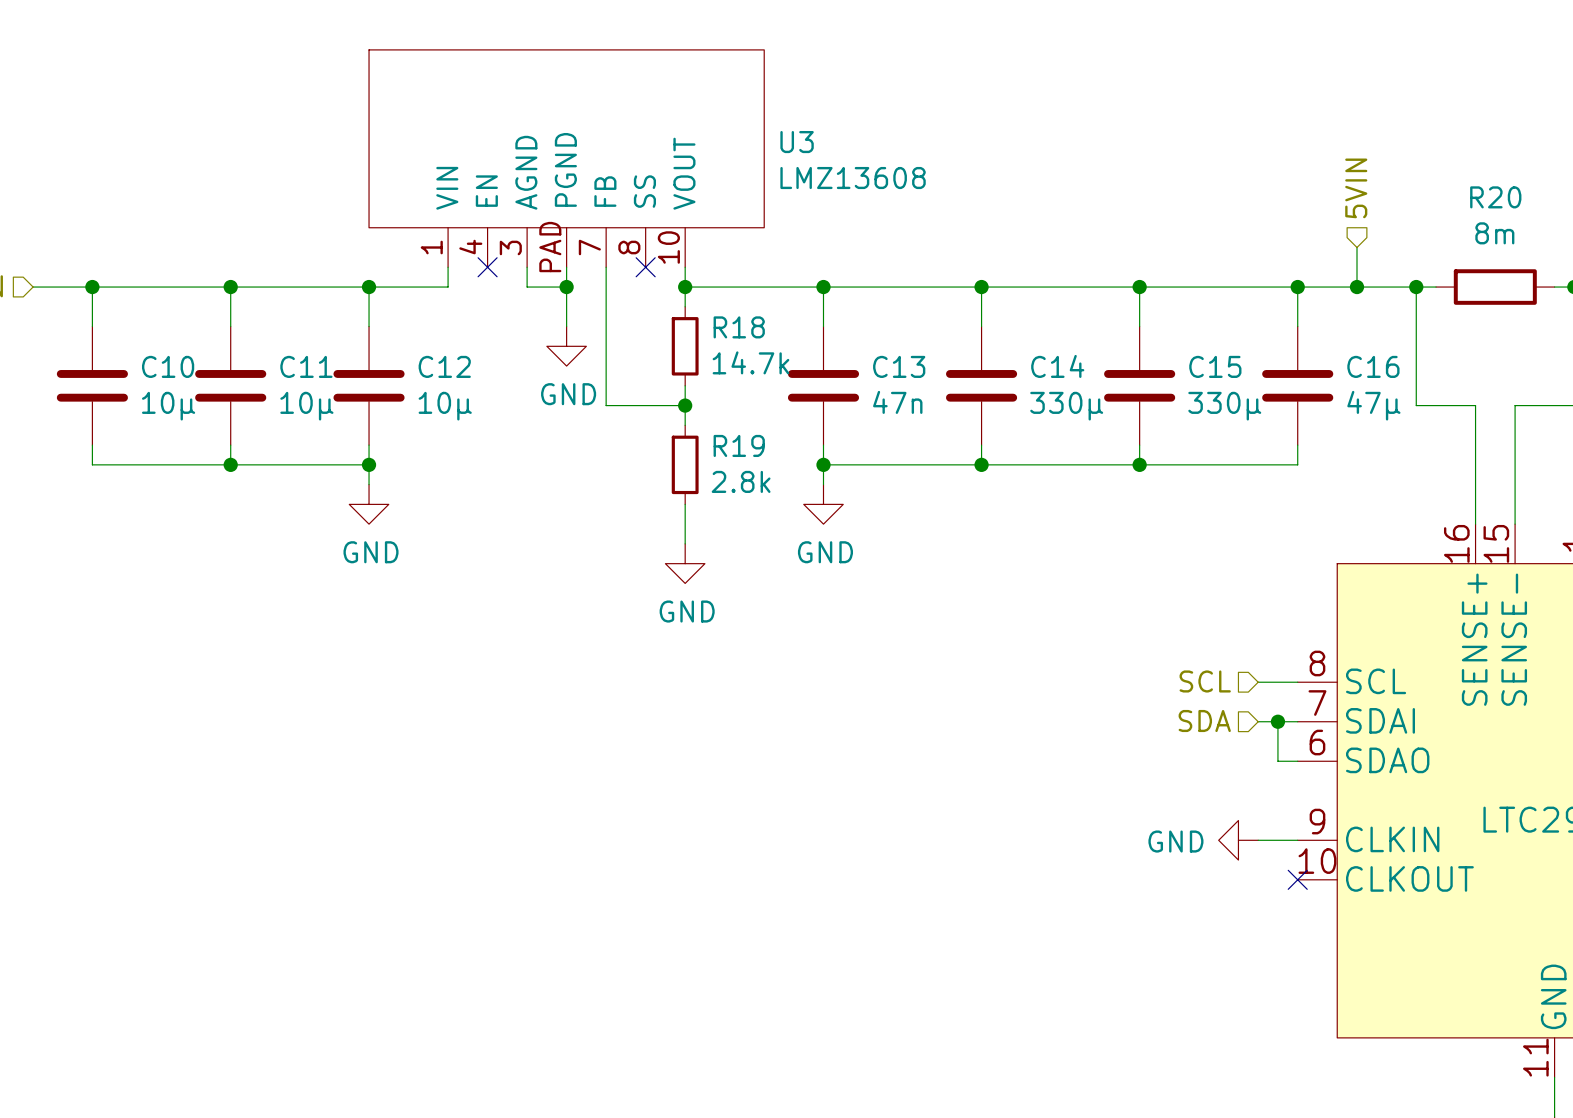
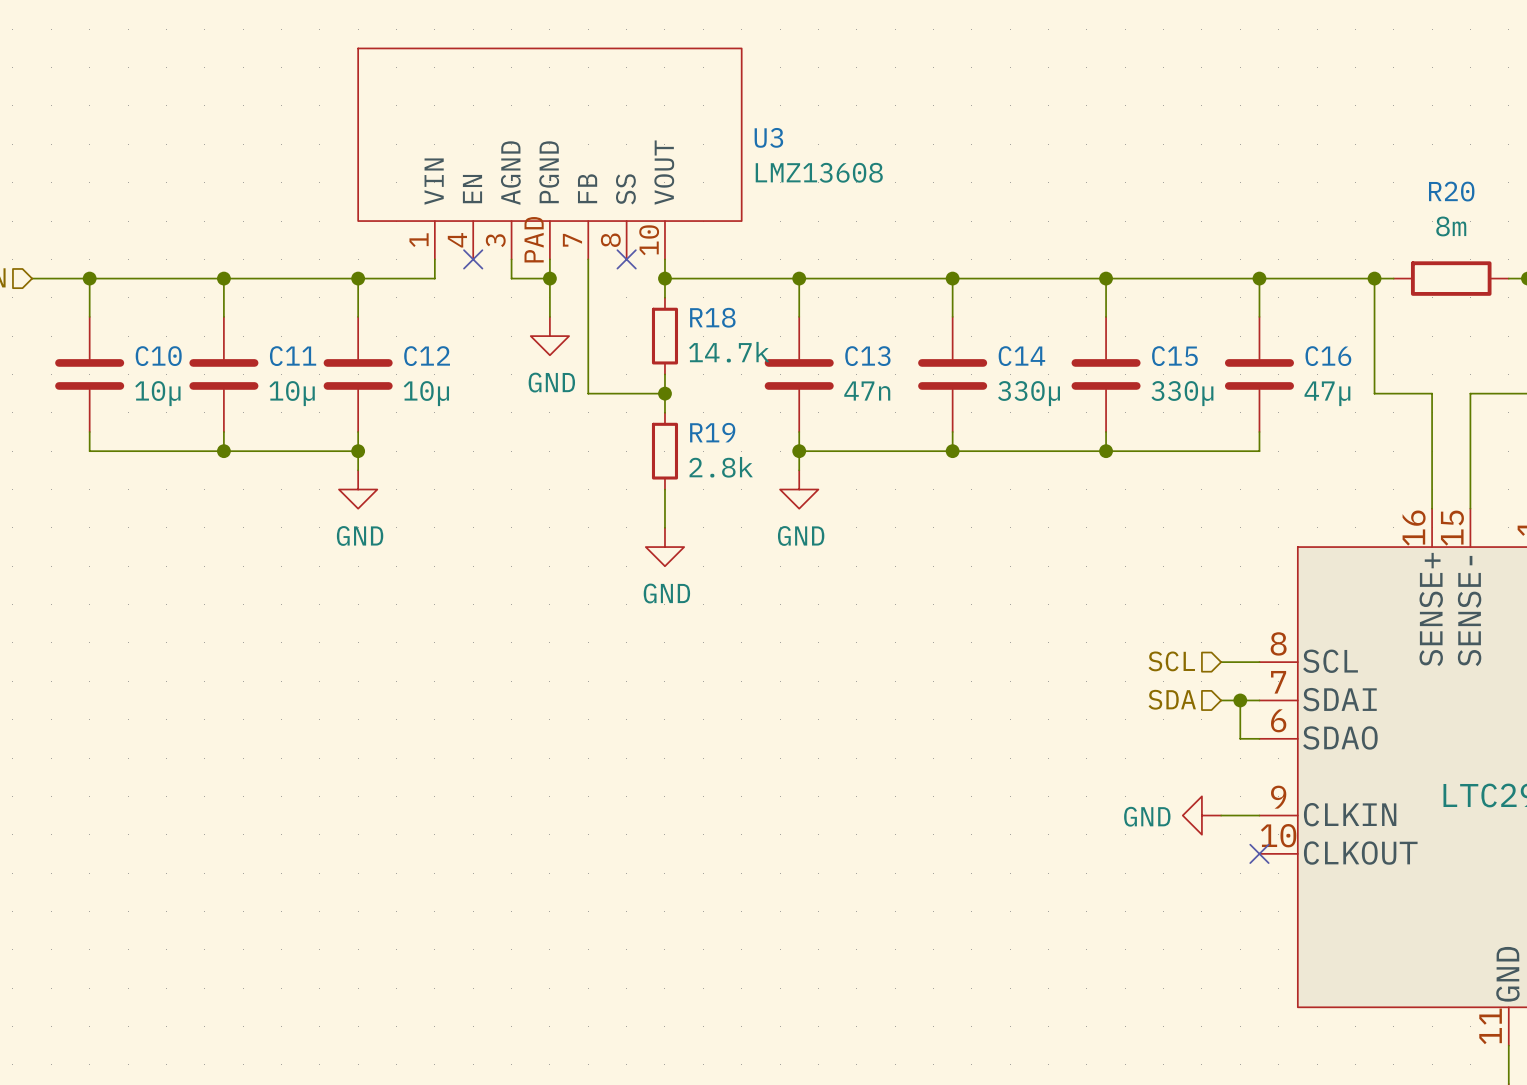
hierarchical label: 5VIN (1356, 188) -> none
wire: (1356, 247) (1356, 287) -> none
junction: (1356, 287) -> none

